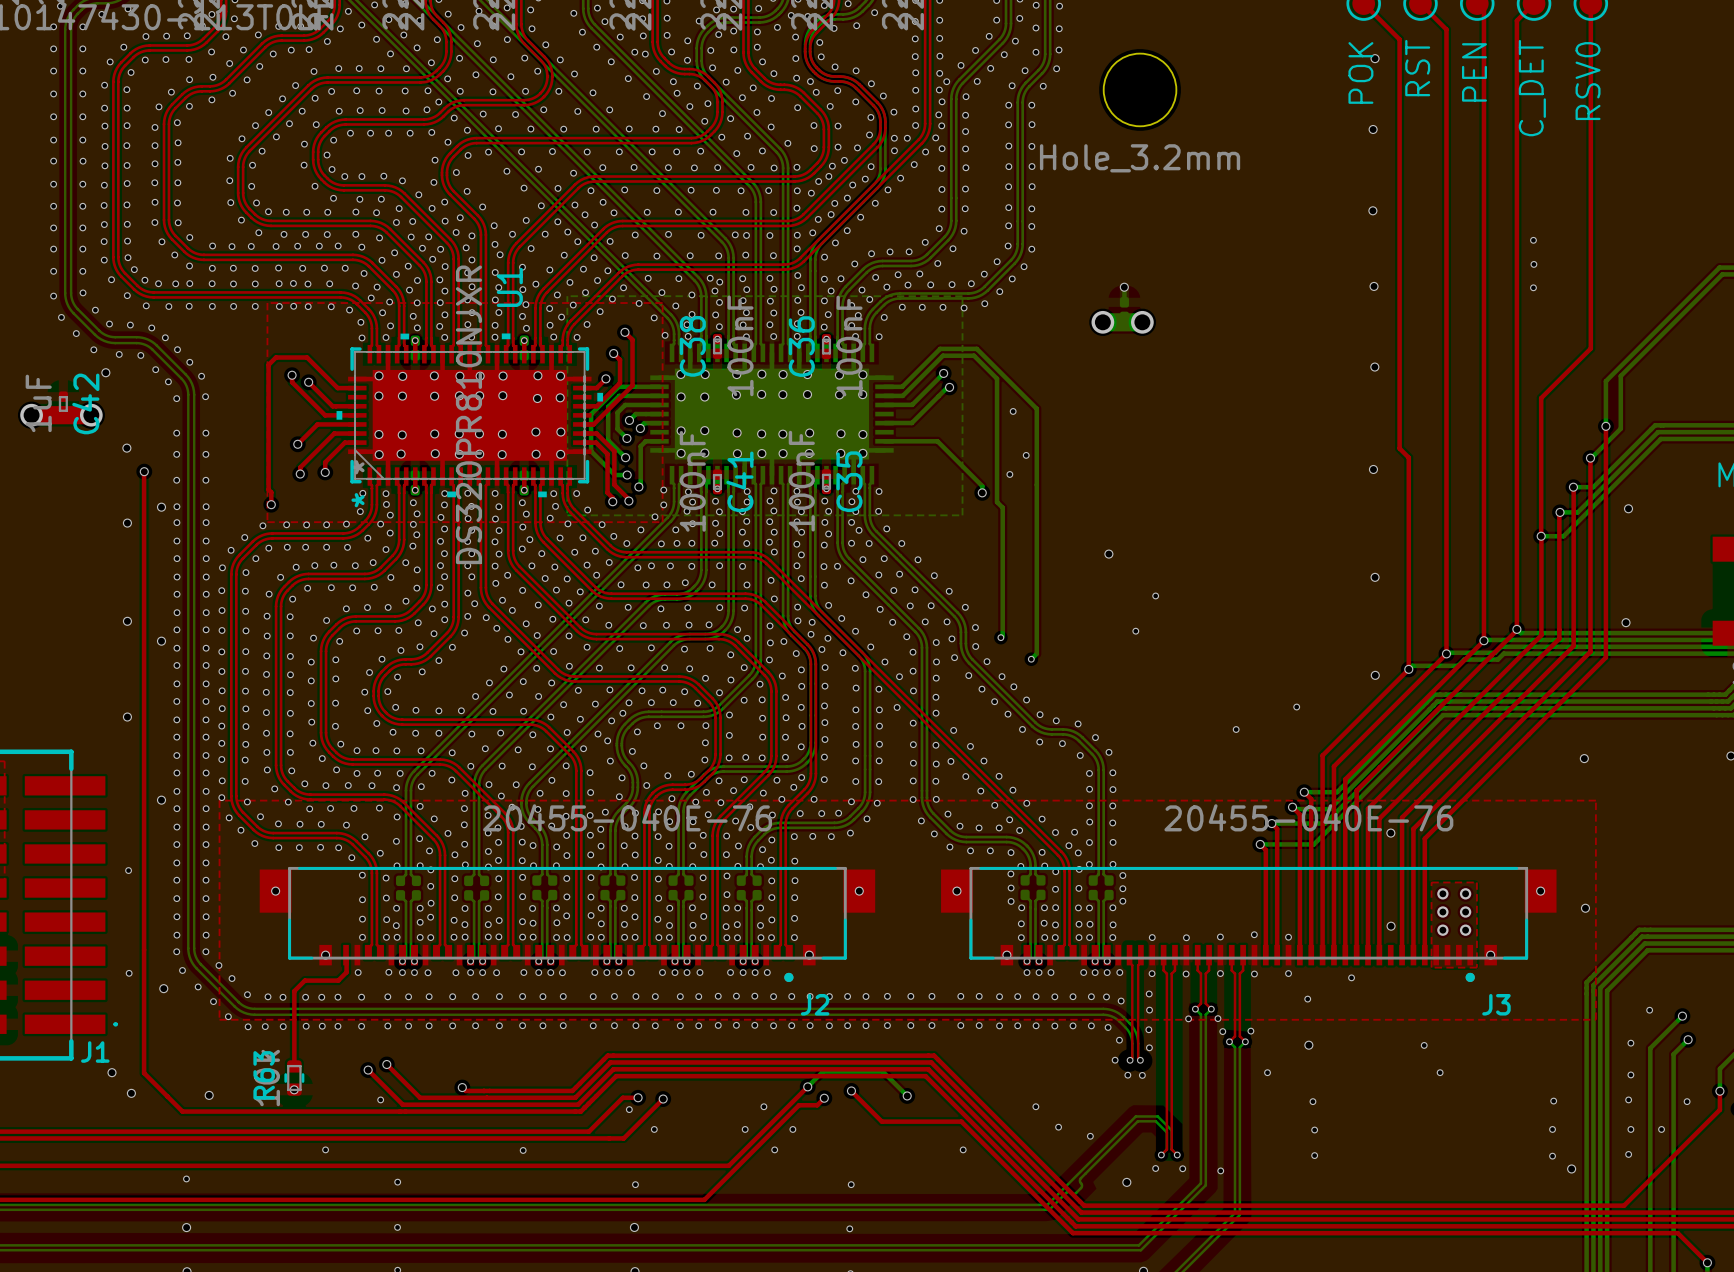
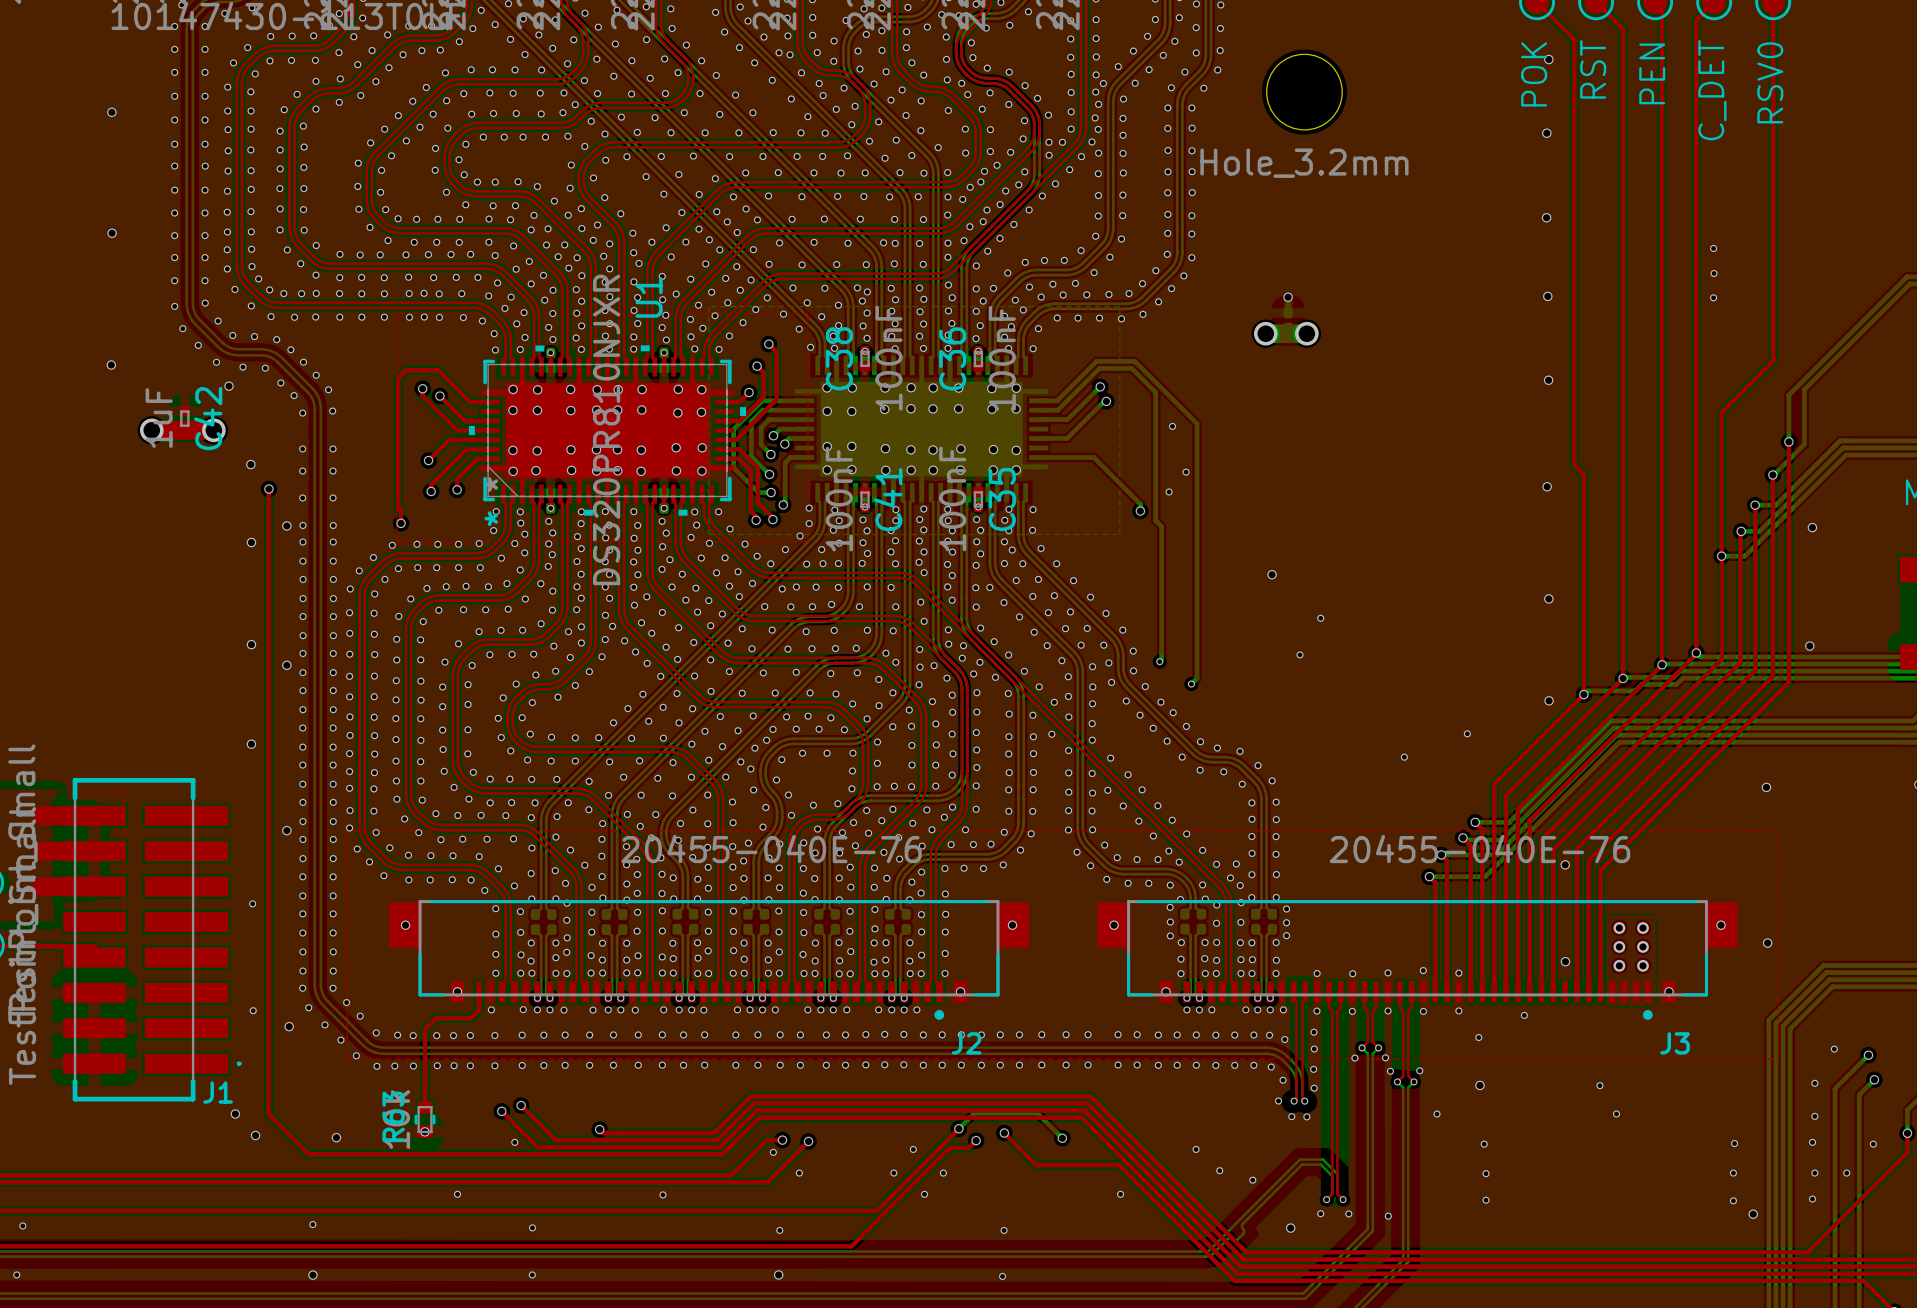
J2 footprint: [259, 866, 876, 982] -> [389, 900, 1030, 1020]
J3 footprint: [941, 866, 1557, 982] -> [1097, 900, 1738, 1020]

